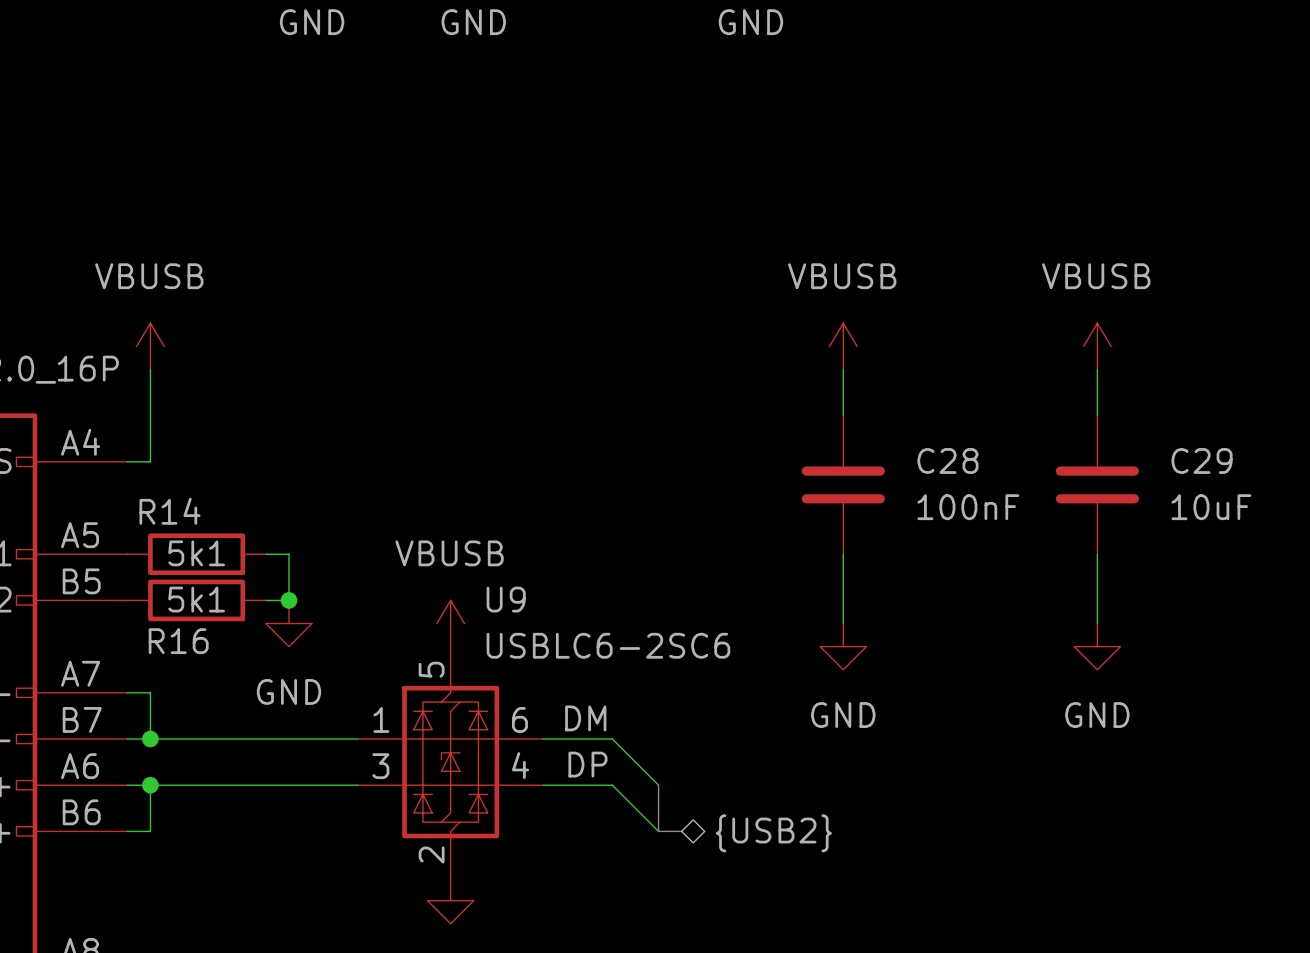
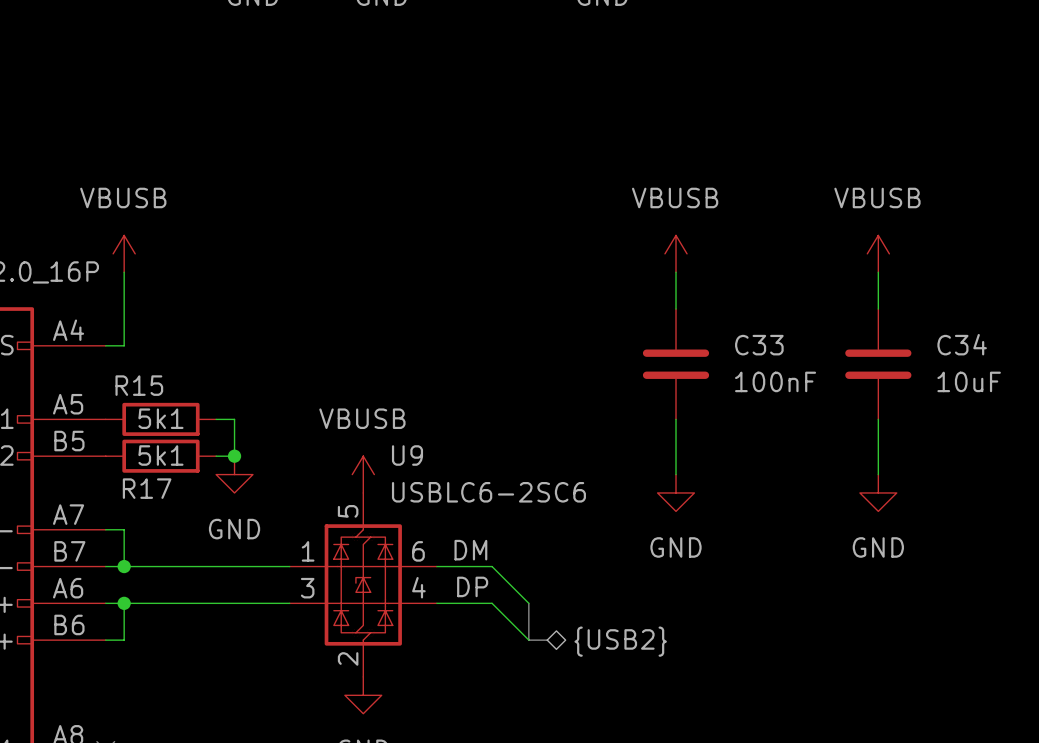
C28 name: C28 (947, 460) -> C33 (759, 345)
C29 name: C29 (1202, 460) -> C34 (962, 344)
R14 name: R14 (170, 511) -> R15 (139, 385)
R16 name: R16 (178, 641) -> R17 (147, 488)

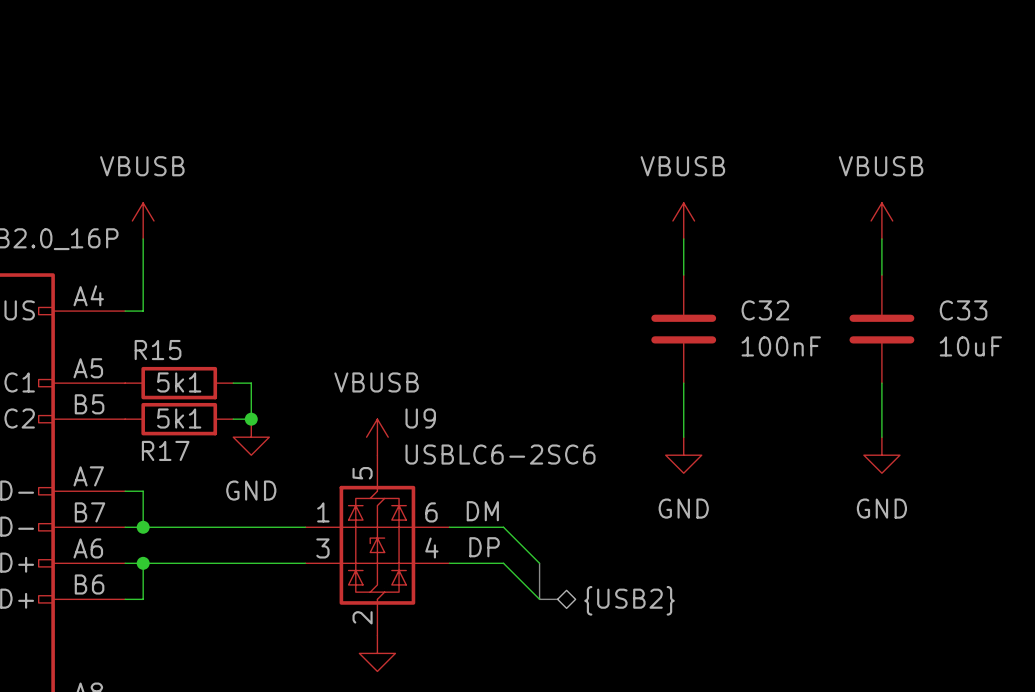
C34 name: C34 (962, 344) -> C33 (963, 310)
C33 name: C33 (759, 345) -> C32 (765, 310)

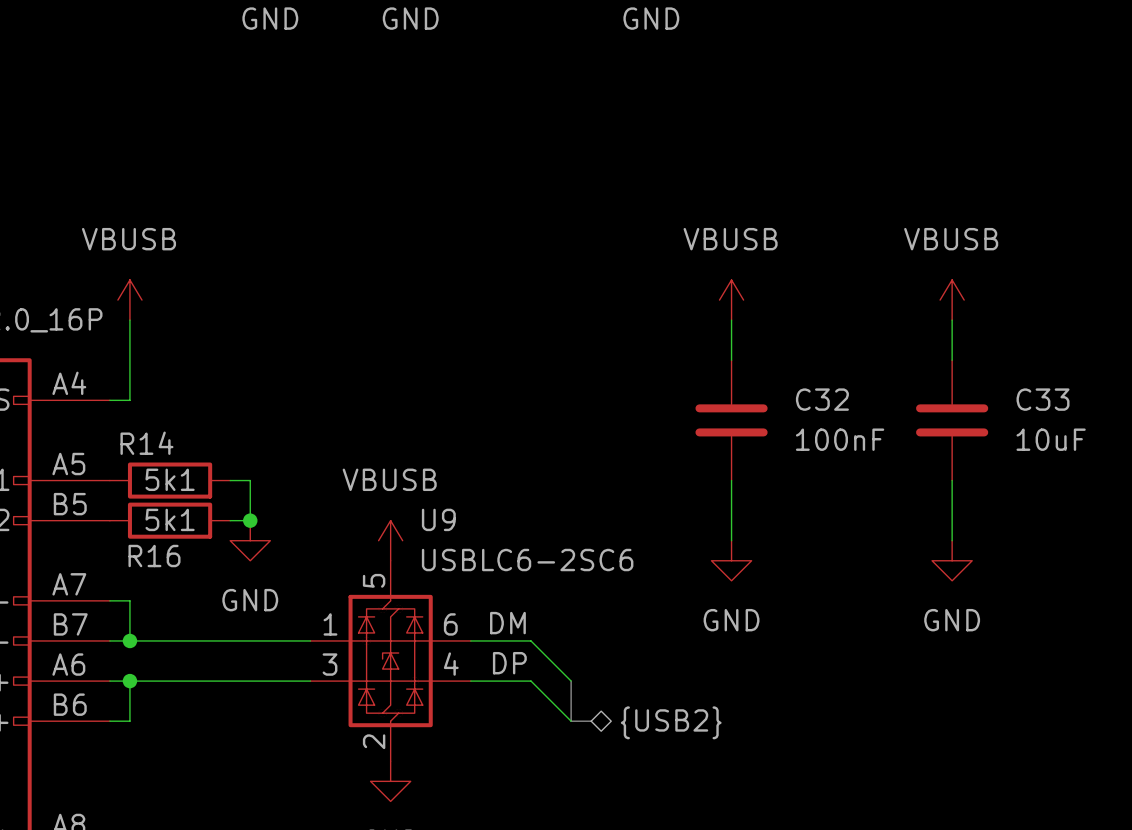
R15 name: R15 (158, 350) -> R14 (146, 443)
R17 name: R17 (165, 450) -> R16 (154, 556)

